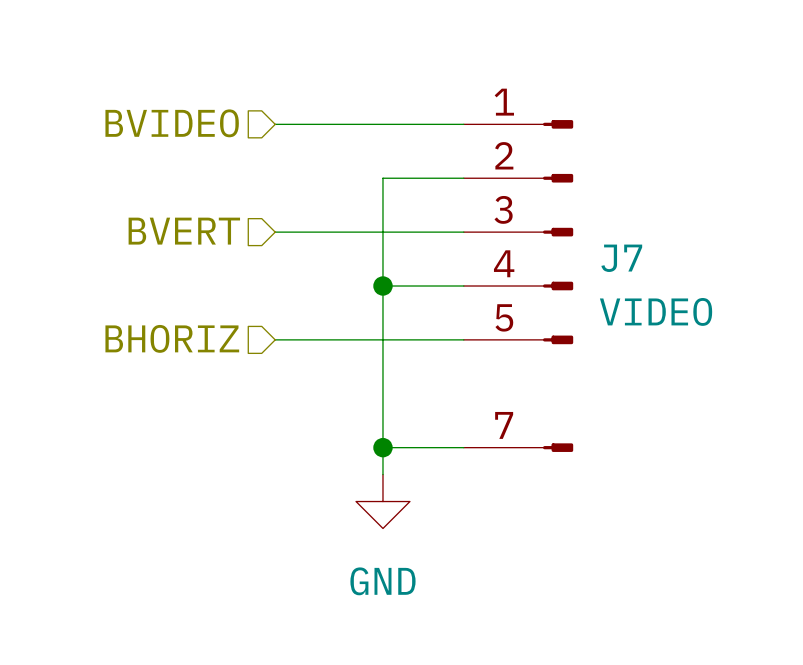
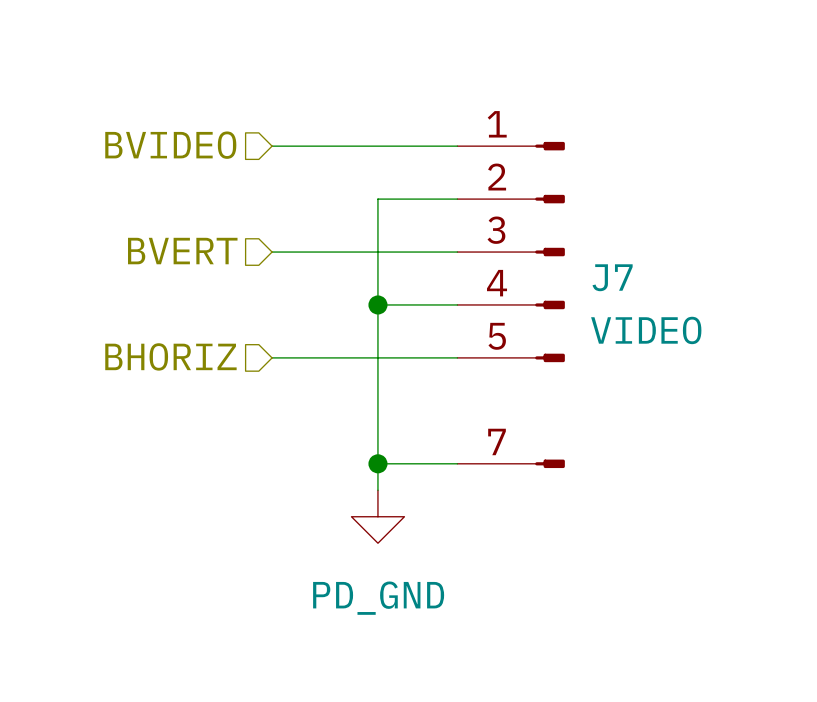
power symbol: GND (382, 501) -> PD_GND (377, 516)

